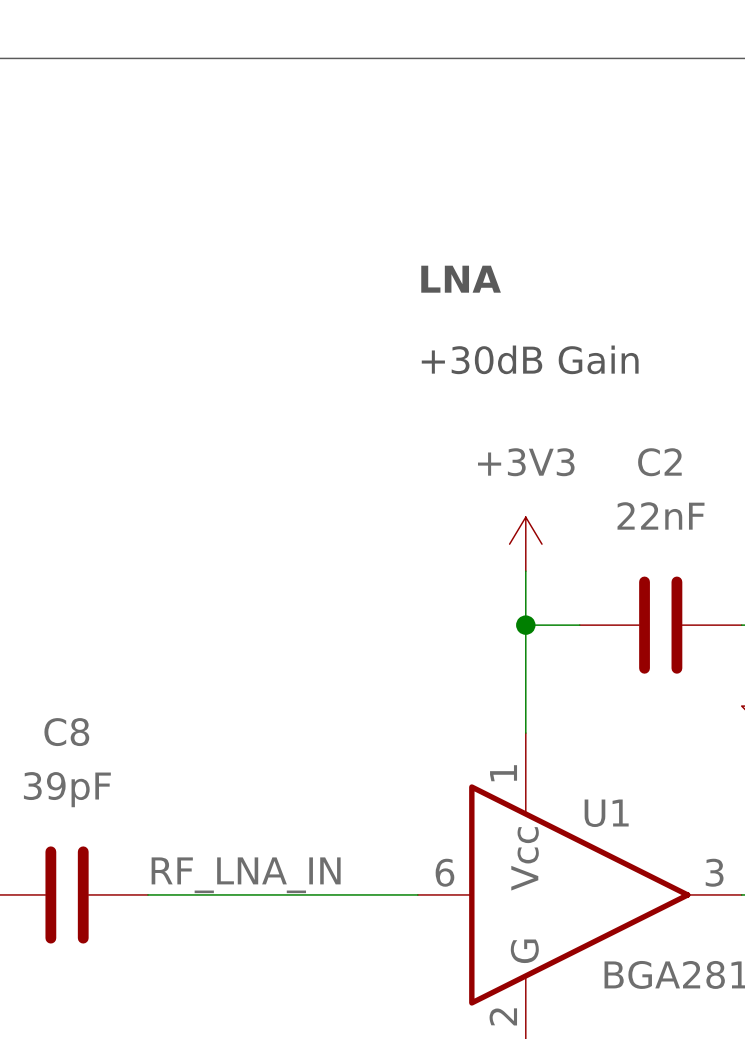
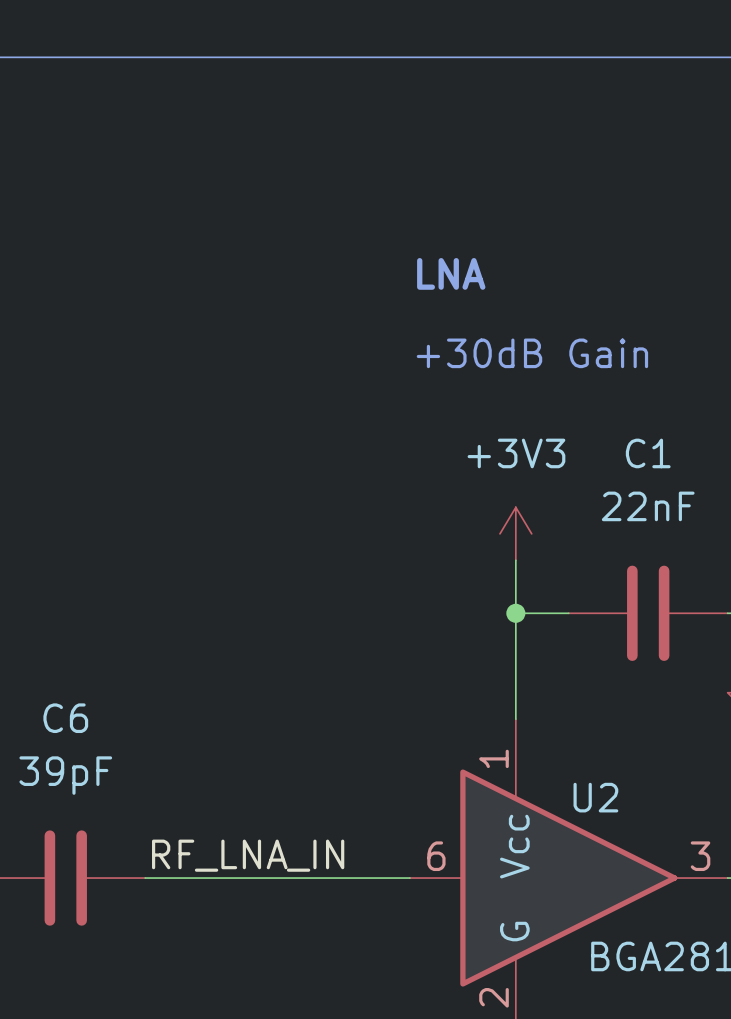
C2 name: C2 (659, 462) -> C1 (648, 453)
C8 name: C8 (66, 732) -> C6 (65, 718)
U1 name: U1 (606, 813) -> U2 (595, 797)

